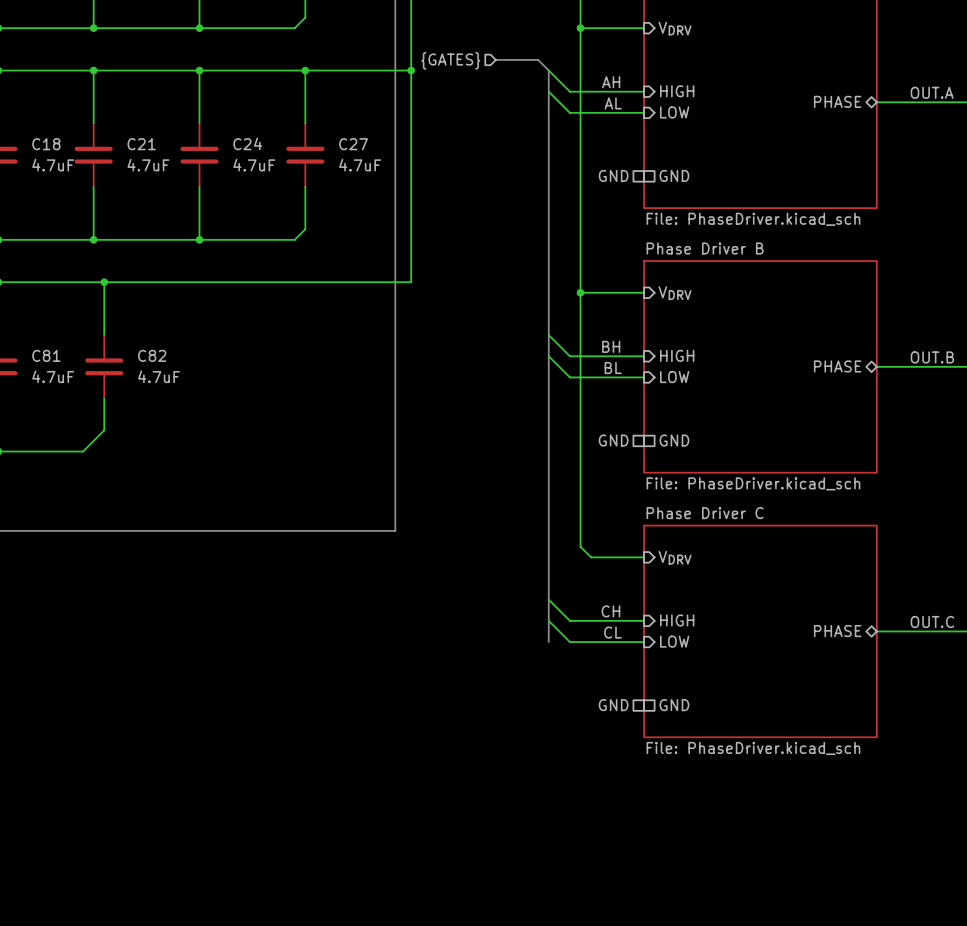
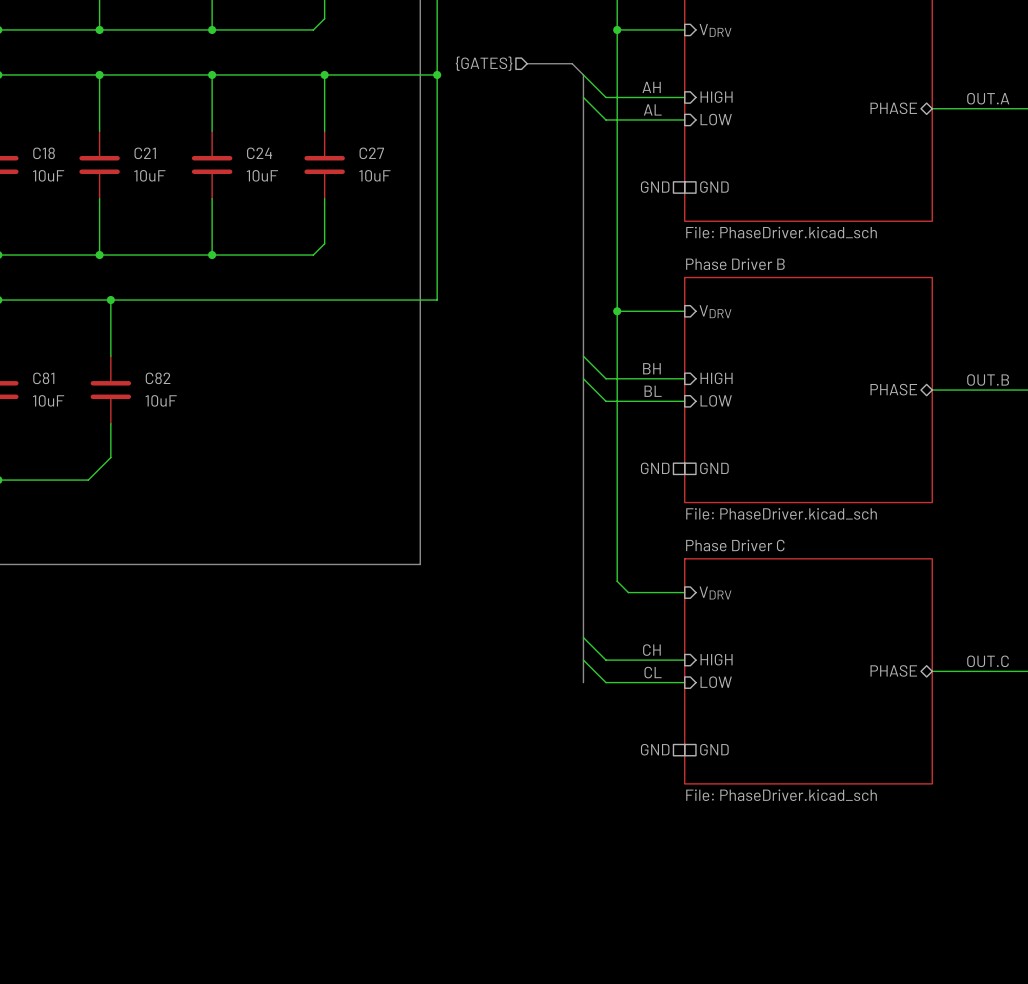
C18 value: 4.7uF (53, 165) -> 10uF (48, 175)
C21 value: 4.7uF (148, 165) -> 10uF (149, 175)
C24 value: 4.7uF (254, 165) -> 10uF (262, 175)
C27 value: 4.7uF (360, 165) -> 10uF (374, 175)
C81 value: 4.7uF (53, 376) -> 10uF (48, 400)
C82 value: 4.7uF (159, 376) -> 10uF (161, 400)

